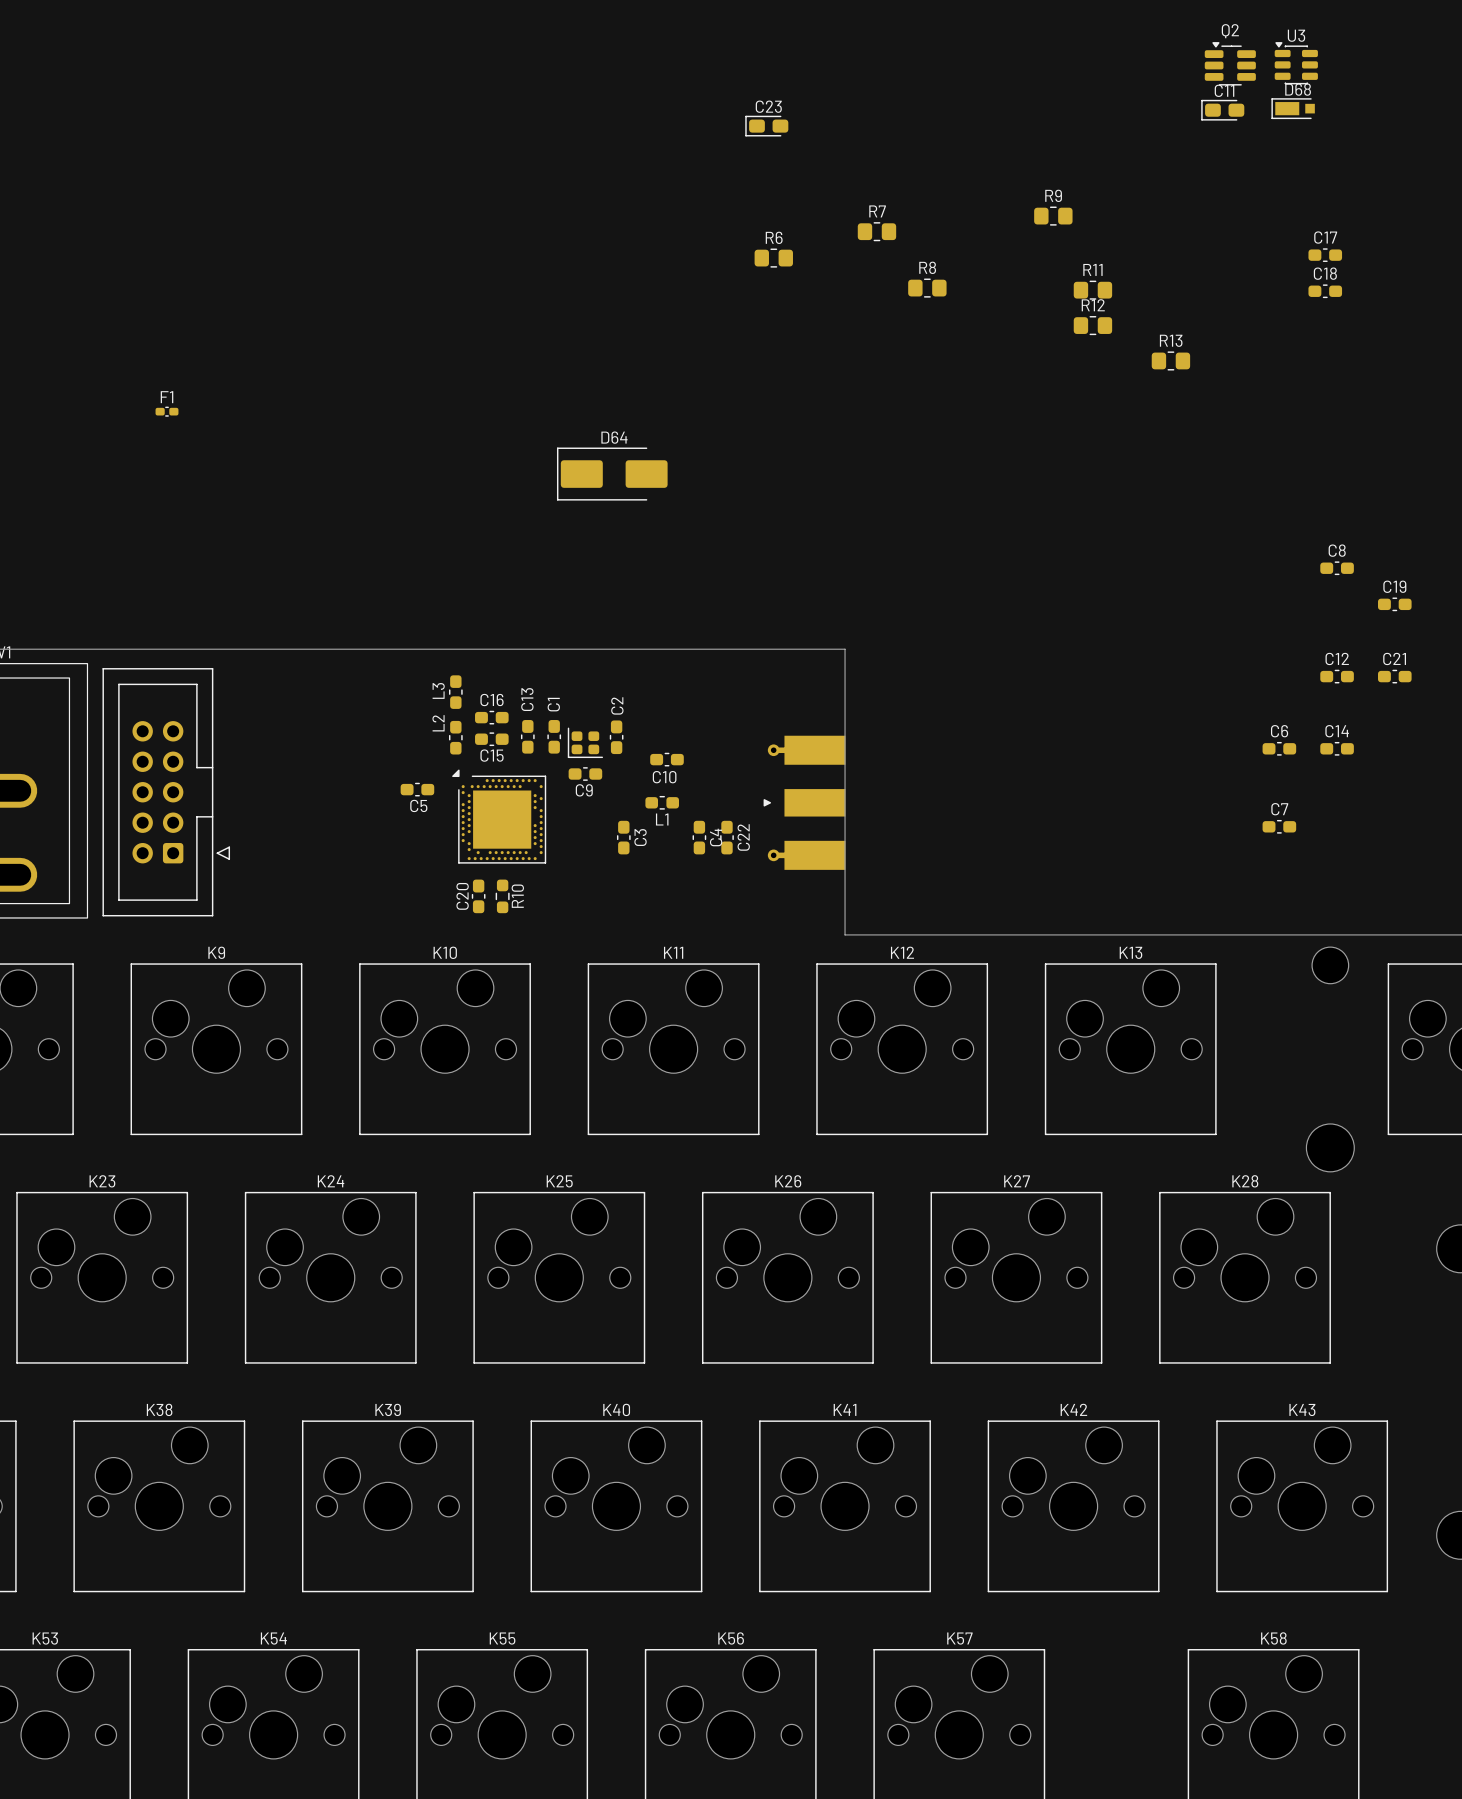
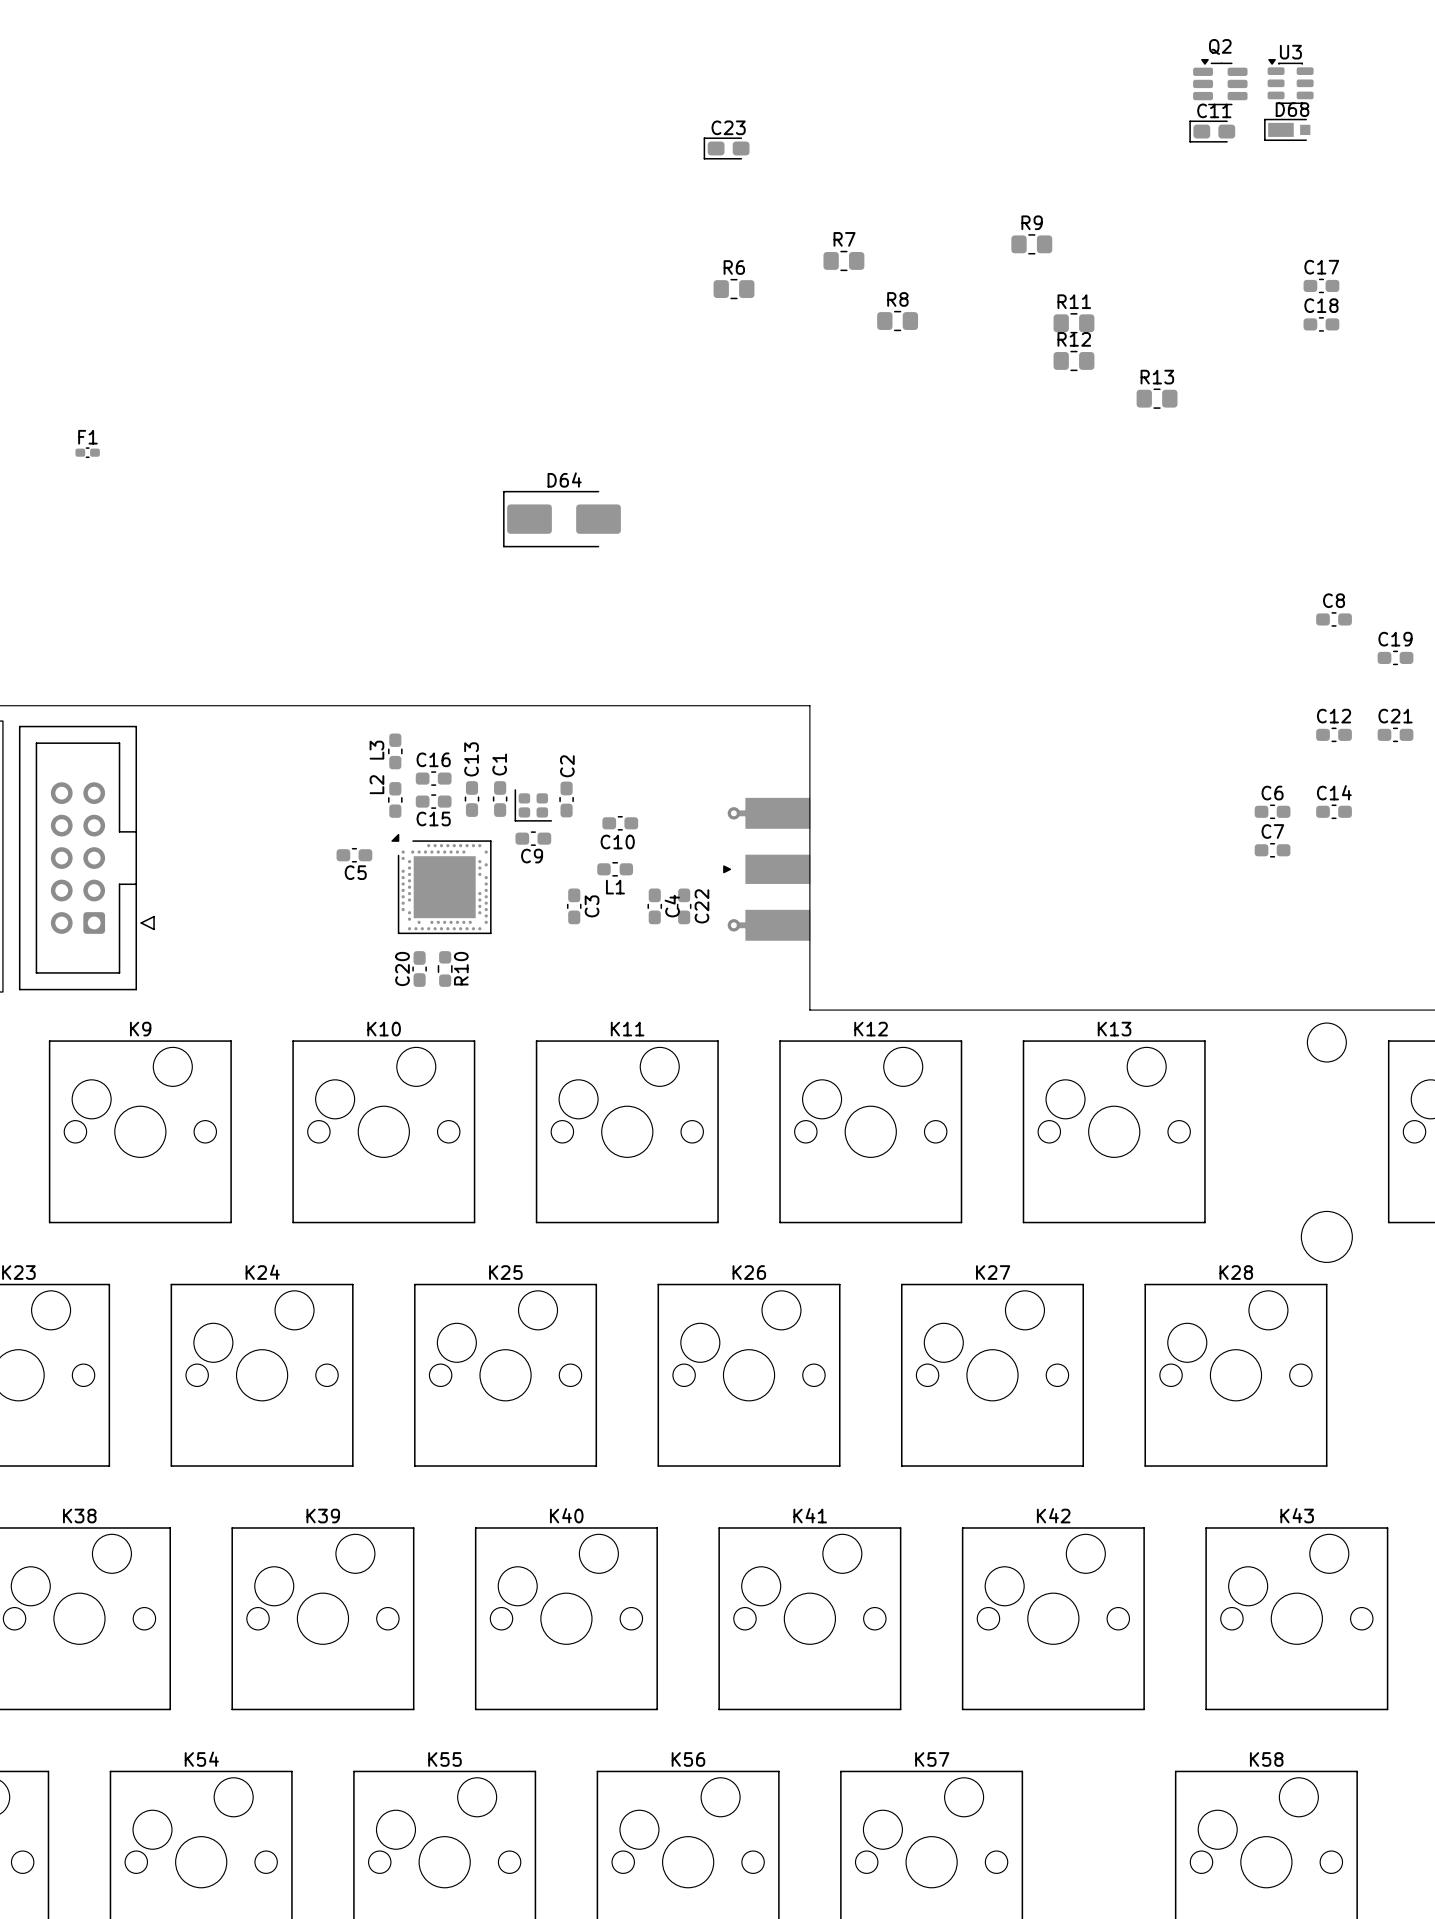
C7 position: (1279, 826) -> (1272, 850)

